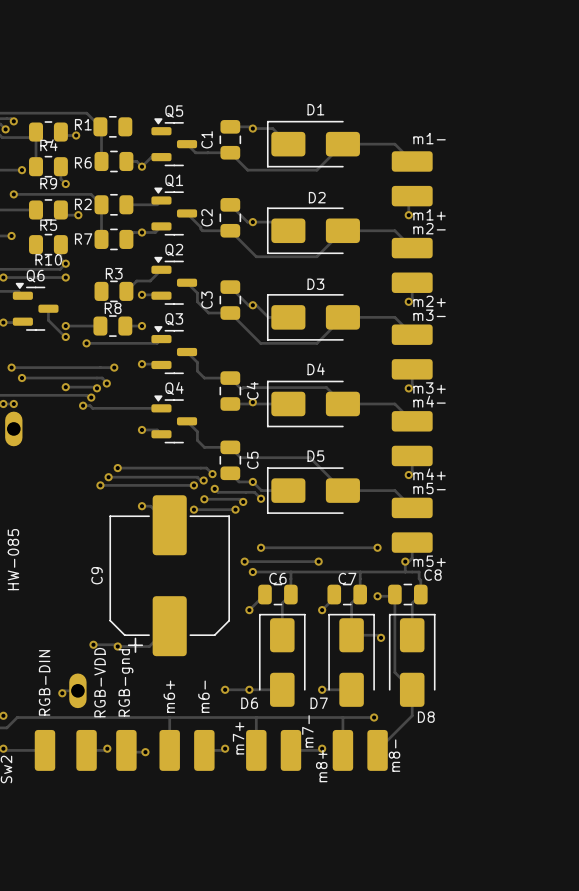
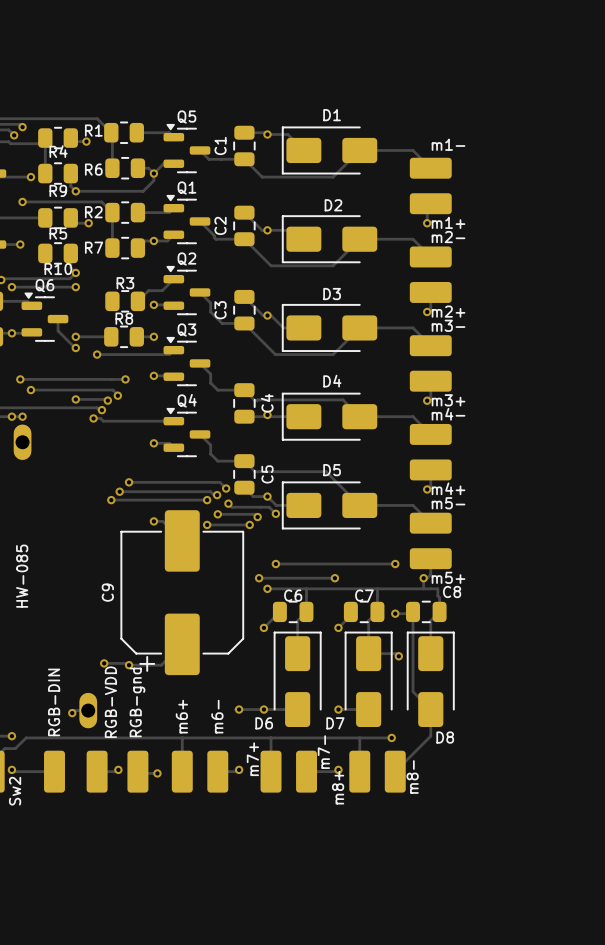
track: none -> (136, 132) (169, 132) (173, 137)
track: none -> (153, 173) (153, 180) (143, 191) (75, 191)

